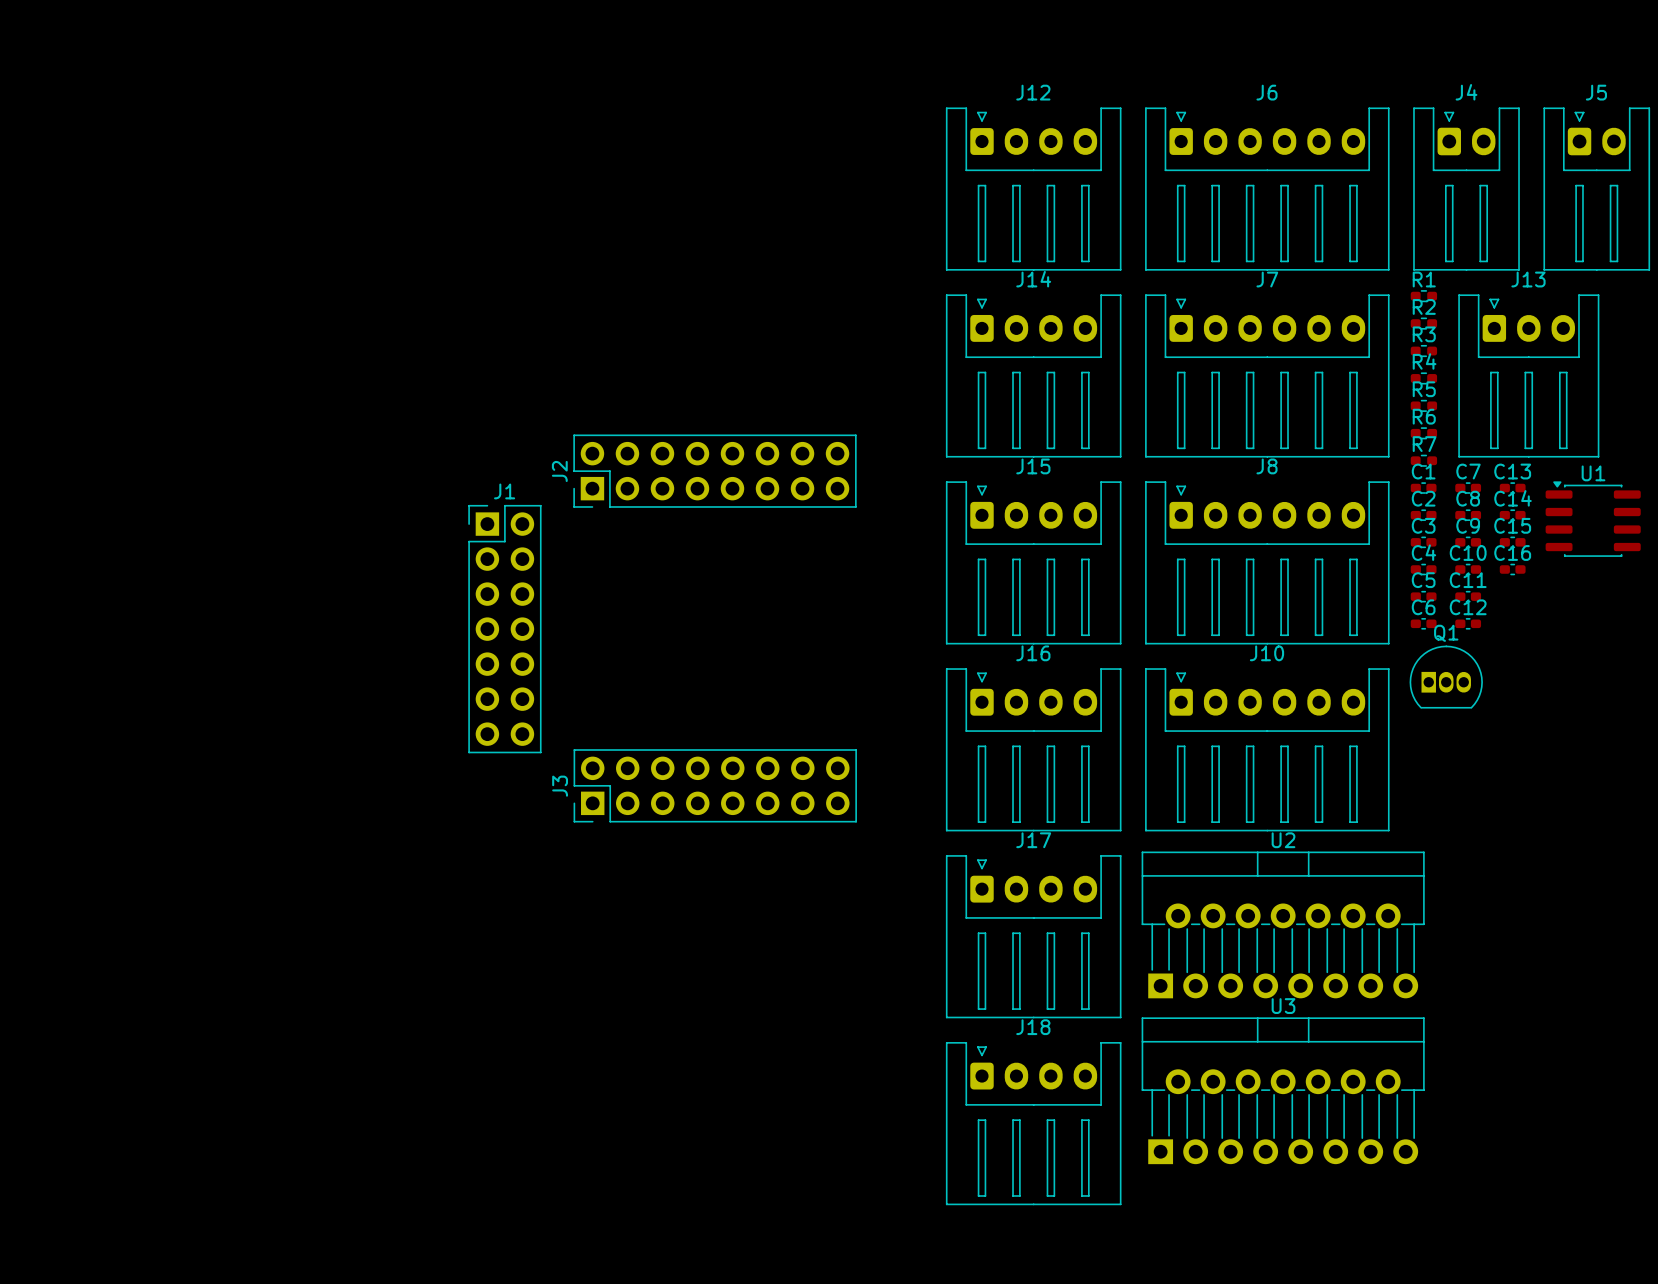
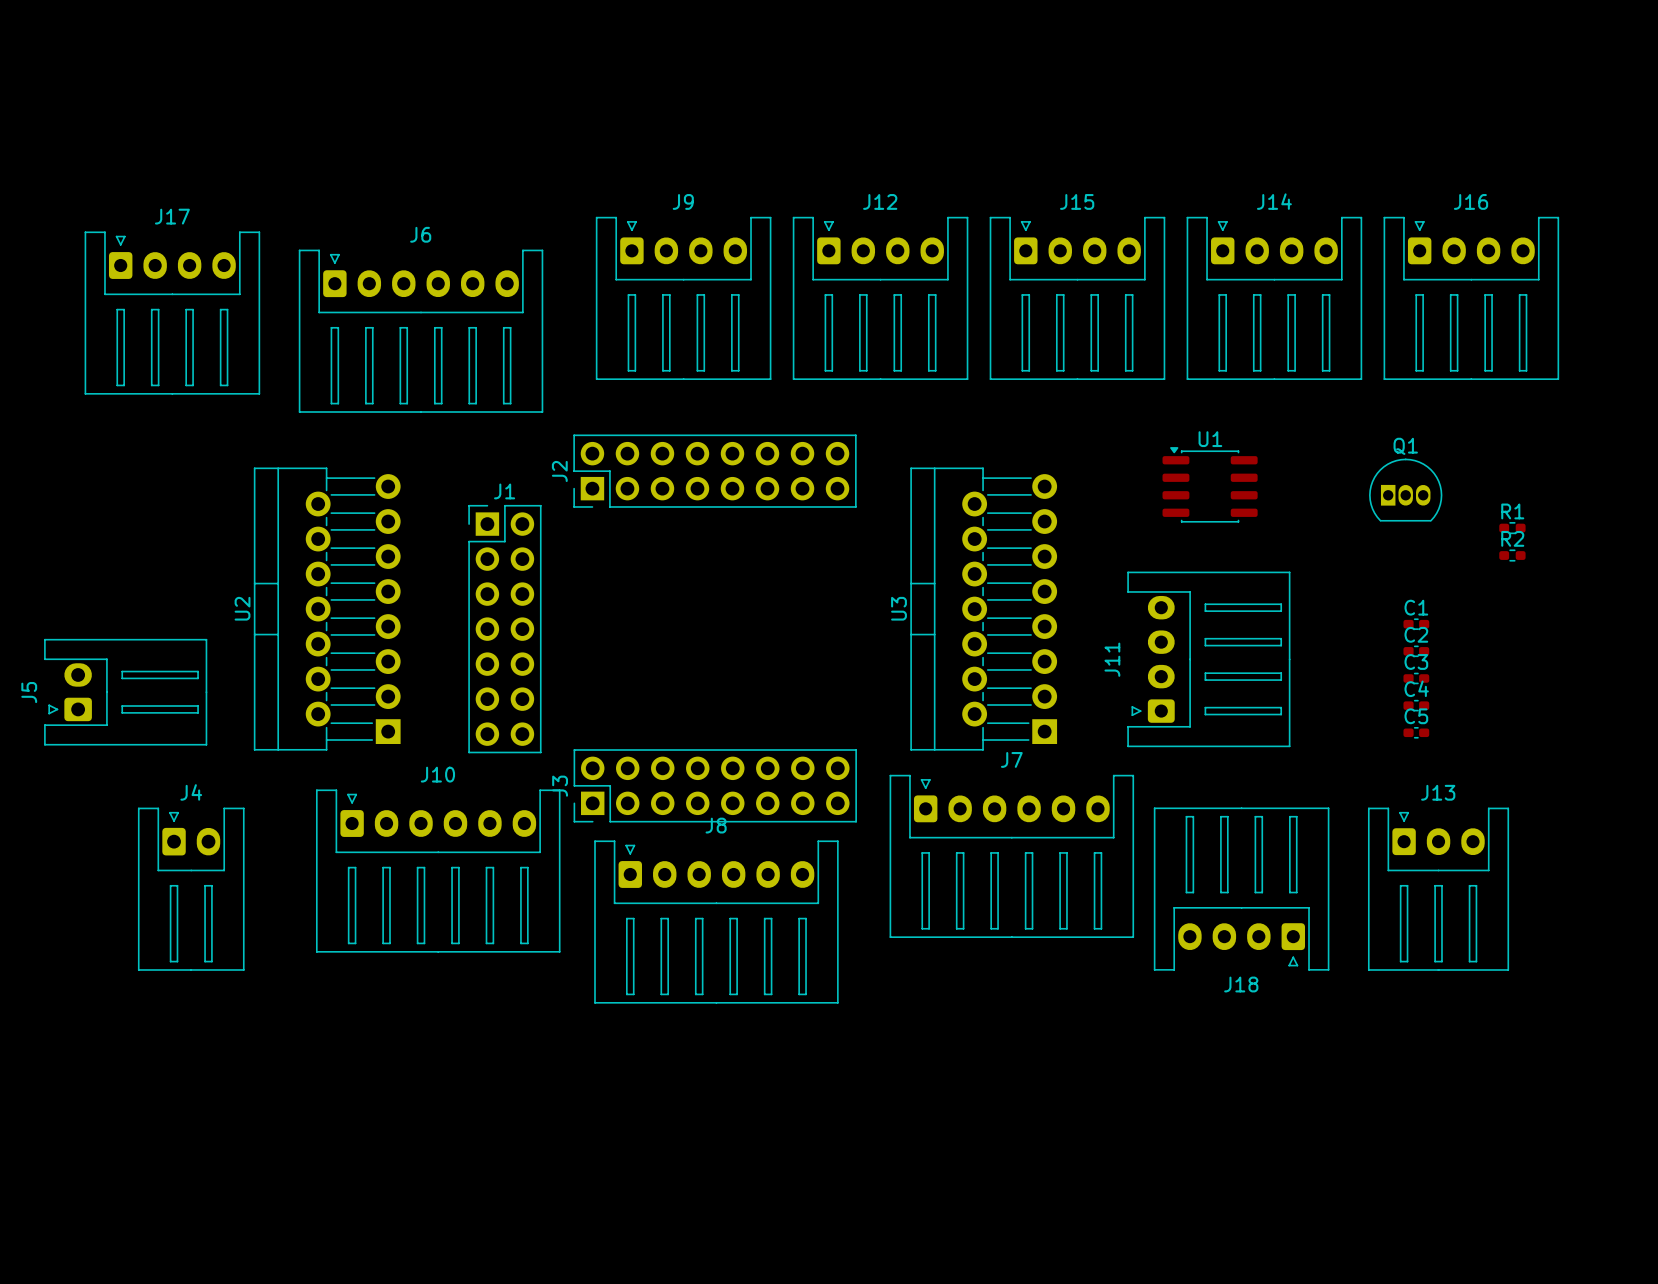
J12 position: (1033, 189) -> (880, 298)
J6 position: (1267, 189) -> (421, 331)
J4 position: (1466, 189) -> (191, 889)
J5 rotation: 0° (1596, 189) -> 90° counterclockwise (125, 692)
J5 position: (1596, 189) -> (125, 692)
R1 position: (1423, 296) -> (1512, 528)
J9: none -> (683, 298)
R2 position: (1423, 323) -> (1512, 555)
R3: (1423, 351) -> none
J14 position: (1033, 375) -> (1274, 298)
J7 position: (1267, 375) -> (1011, 856)
J13 position: (1528, 375) -> (1438, 889)
R4: (1423, 378) -> none
R5: (1423, 405) -> none
R6: (1423, 433) -> none
R7: (1423, 460) -> none
C1 position: (1423, 488) -> (1416, 624)
C7: (1468, 488) -> none
C13: (1512, 488) -> none
C2 position: (1423, 515) -> (1416, 651)
C8: (1468, 515) -> none
C14: (1512, 515) -> none
U1 position: (1593, 519) -> (1210, 484)
C3 position: (1423, 542) -> (1416, 678)
C9: (1468, 542) -> none
C15: (1512, 542) -> none
J15 position: (1033, 562) -> (1077, 298)
J8 position: (1267, 562) -> (716, 922)
C4 position: (1423, 569) -> (1416, 705)
C10: (1468, 569) -> none
C16: (1512, 569) -> none
C5 position: (1423, 596) -> (1416, 732)
C11: (1468, 596) -> none
C6: (1423, 623) -> none
C12: (1468, 623) -> none
J11: none -> (1208, 659)
Q1 position: (1446, 677) -> (1405, 490)
J16 position: (1033, 749) -> (1471, 298)
J10 position: (1267, 749) -> (438, 871)
U2 rotation: 0° (1283, 924) -> 90° counterclockwise (327, 609)
U2 position: (1283, 924) -> (327, 609)
J17 position: (1033, 936) -> (172, 313)
U3 rotation: 0° (1283, 1090) -> 90° counterclockwise (983, 609)
U3 position: (1283, 1090) -> (983, 609)
J18 rotation: 0° (1033, 1123) -> 180° (1241, 889)
J18 position: (1033, 1123) -> (1241, 889)

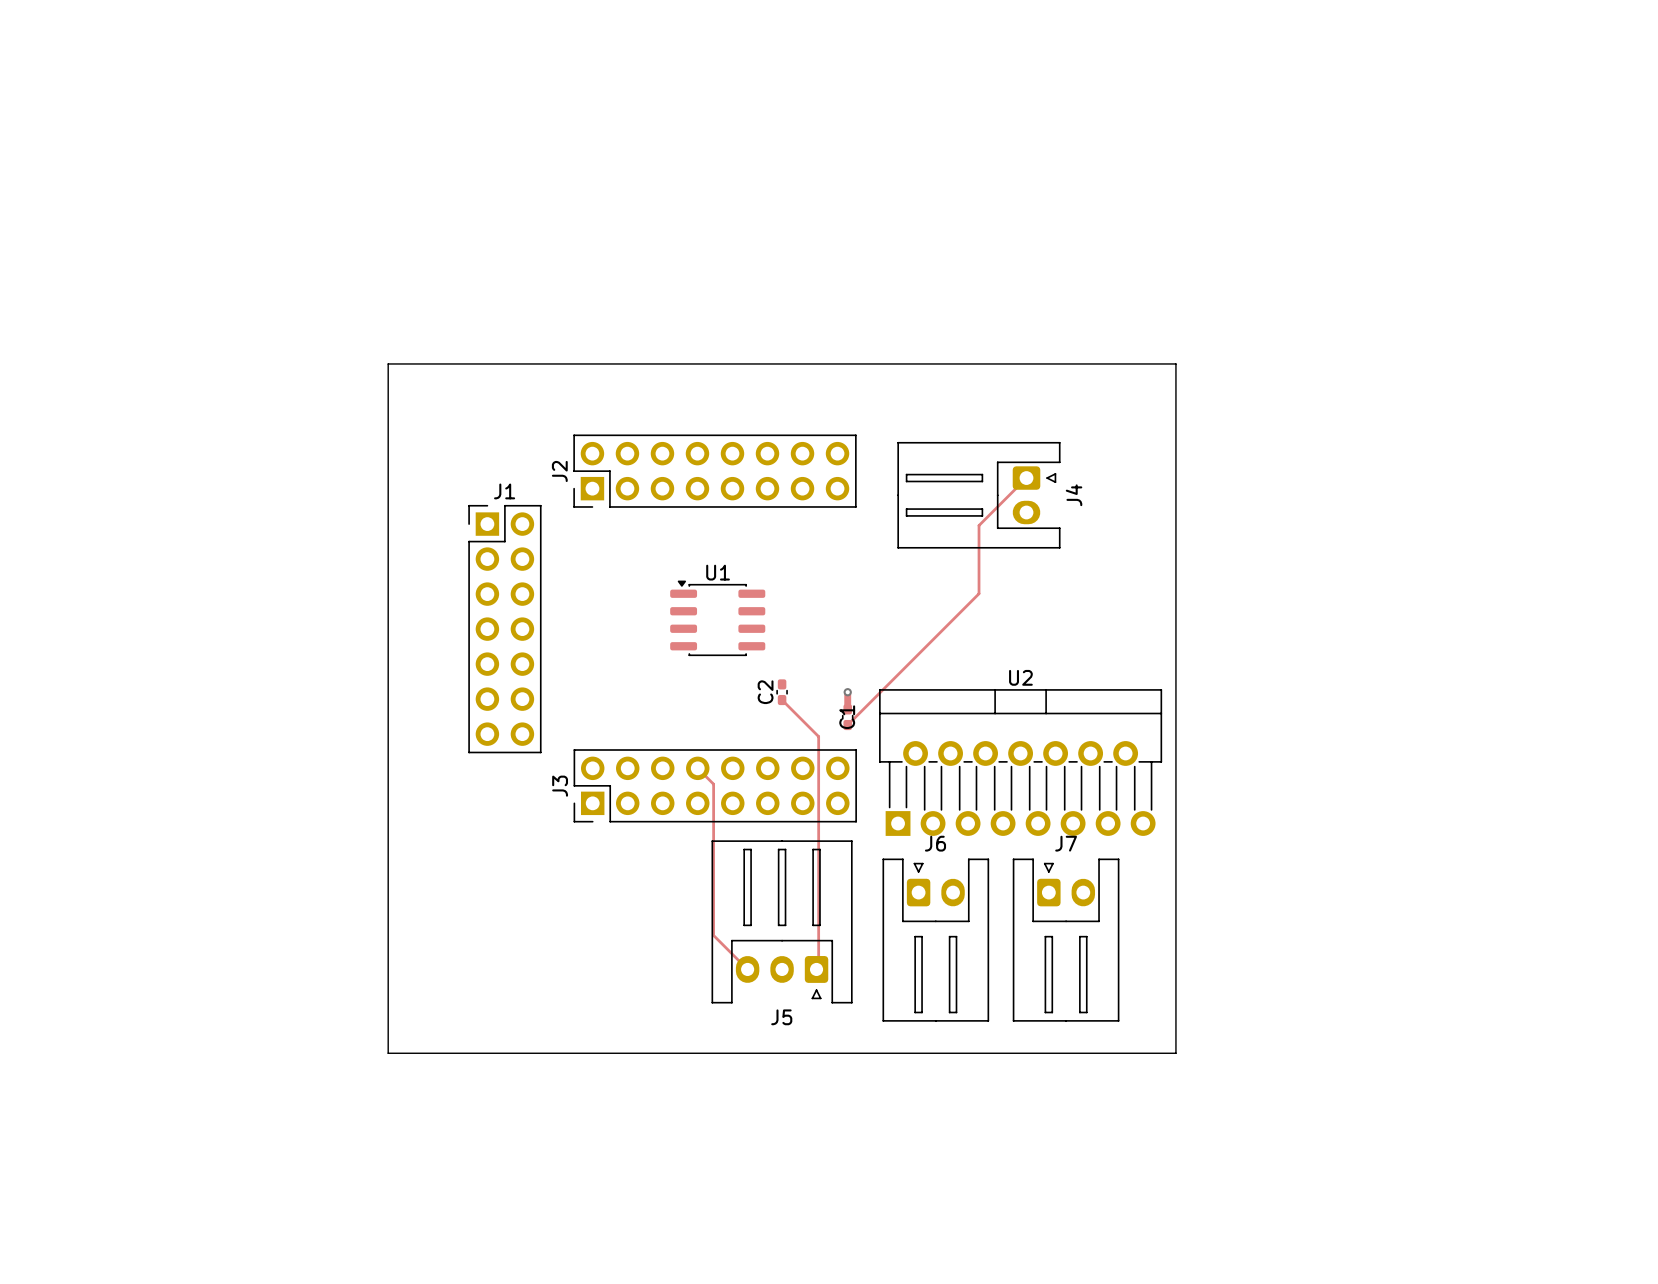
J6 footprint: [298, 249, 544, 413] -> [882, 858, 990, 1022]
J9: (683, 298) -> none
J12: (880, 298) -> none
J15: (1077, 298) -> none
J14: (1274, 298) -> none
J16: (1471, 298) -> none
J17: (172, 313) -> none
board edge: none -> (388, 363) (1175, 363) (1175, 1053) (388, 1053) (388, 363)
track: none -> (1026, 478) (979, 525) (979, 593) (847, 725)
U1 position: (1210, 484) -> (717, 618)
Q1: (1405, 490) -> none
R1: (1512, 528) -> none
R2: (1512, 555) -> none
U2 rotation: 0° (327, 609) -> 90° clockwise (1020, 762)
U2 position: (327, 609) -> (1020, 762)
U3: (983, 609) -> none
C1 rotation: 0° (1416, 624) -> 90° clockwise (847, 717)
C1 position: (1416, 624) -> (847, 717)
J5 footprint: [44, 638, 208, 746] -> [711, 840, 853, 1004]
C2 rotation: 0° (1416, 651) -> 90° clockwise (782, 692)
C2 position: (1416, 651) -> (782, 692)
J11: (1208, 659) -> none
C3: (1416, 678) -> none
J5 name position: J5 (29, 692) -> J5 (781, 1017)
track: none -> (847, 692) (847, 709)
via: none -> (847, 692)
track: none -> (782, 700) (818, 736) (818, 967) (816, 969)
C4: (1416, 705) -> none
C5: (1416, 732) -> none
track: none -> (697, 768) (713, 784) (713, 935) (747, 969)
J7 footprint: [889, 774, 1135, 938] -> [1012, 858, 1120, 1022]
J10: (438, 871) -> none
J4 rotation: 0° (191, 889) -> 90° clockwise (978, 495)
J4 position: (191, 889) -> (978, 495)
J18: (1241, 889) -> none
J13: (1438, 889) -> none
J8: (716, 922) -> none

